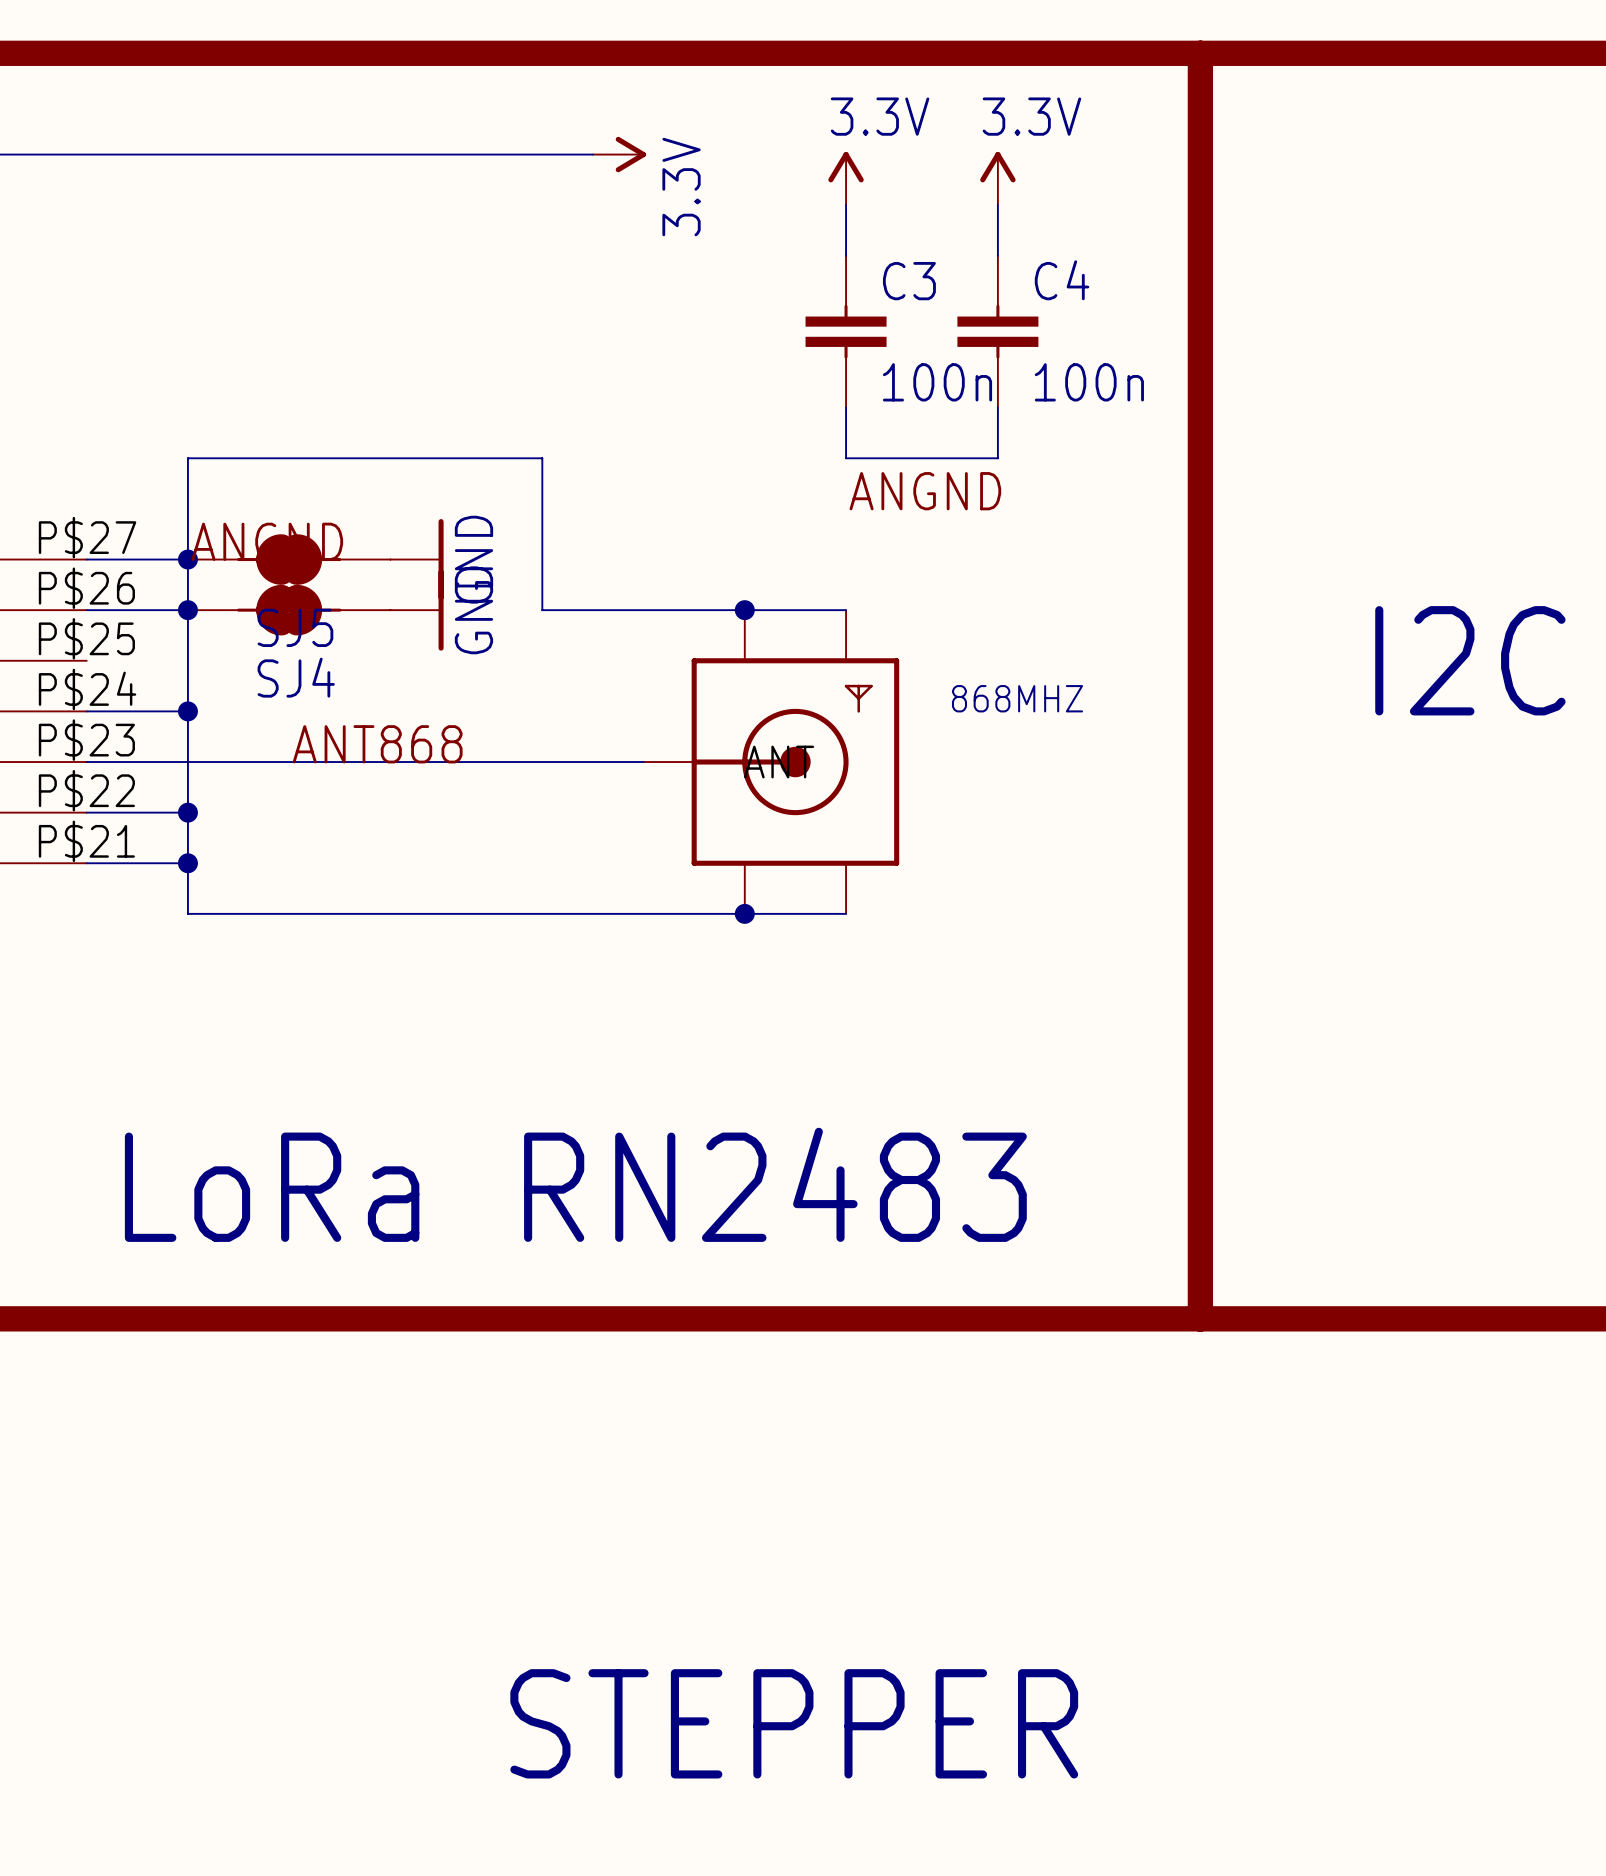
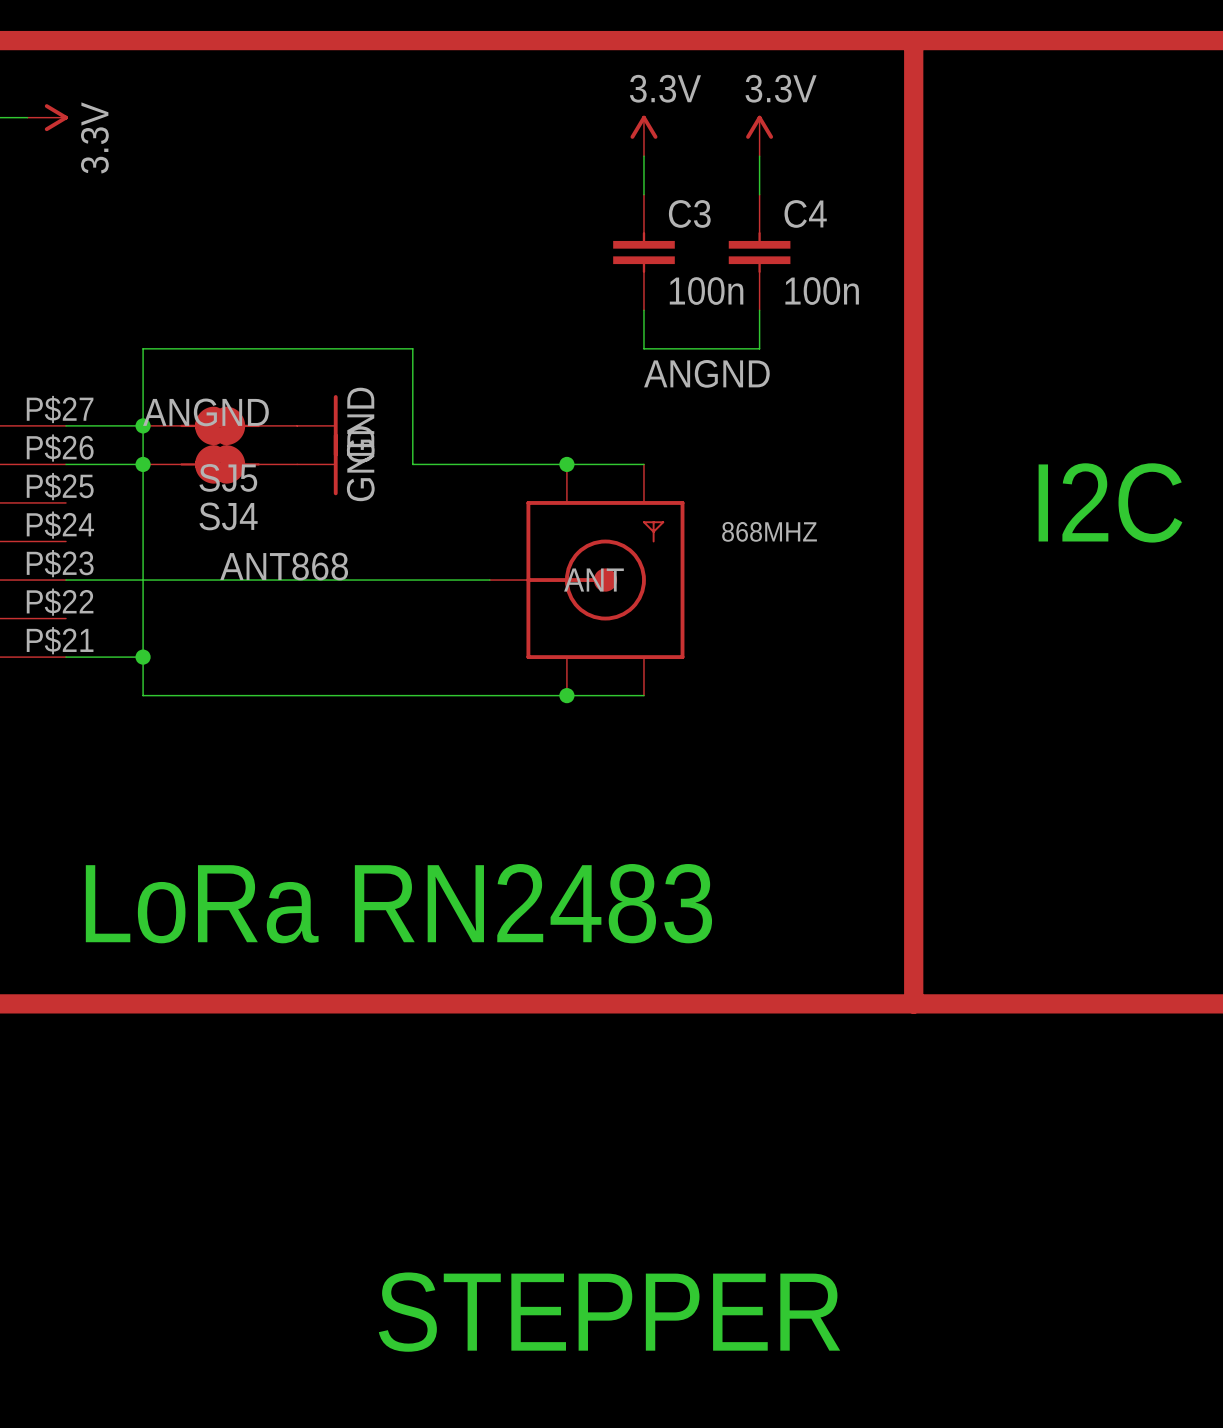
wire: (36, 154) (592, 154) -> none
power symbol: none -> 3.3V (47, 117)
power symbol: 3.3V (619, 154) -> none
wire: (86, 711) (187, 711) -> none
junction: (187, 711) -> none
wire: (86, 812) (187, 812) -> none
junction: (187, 812) -> none

